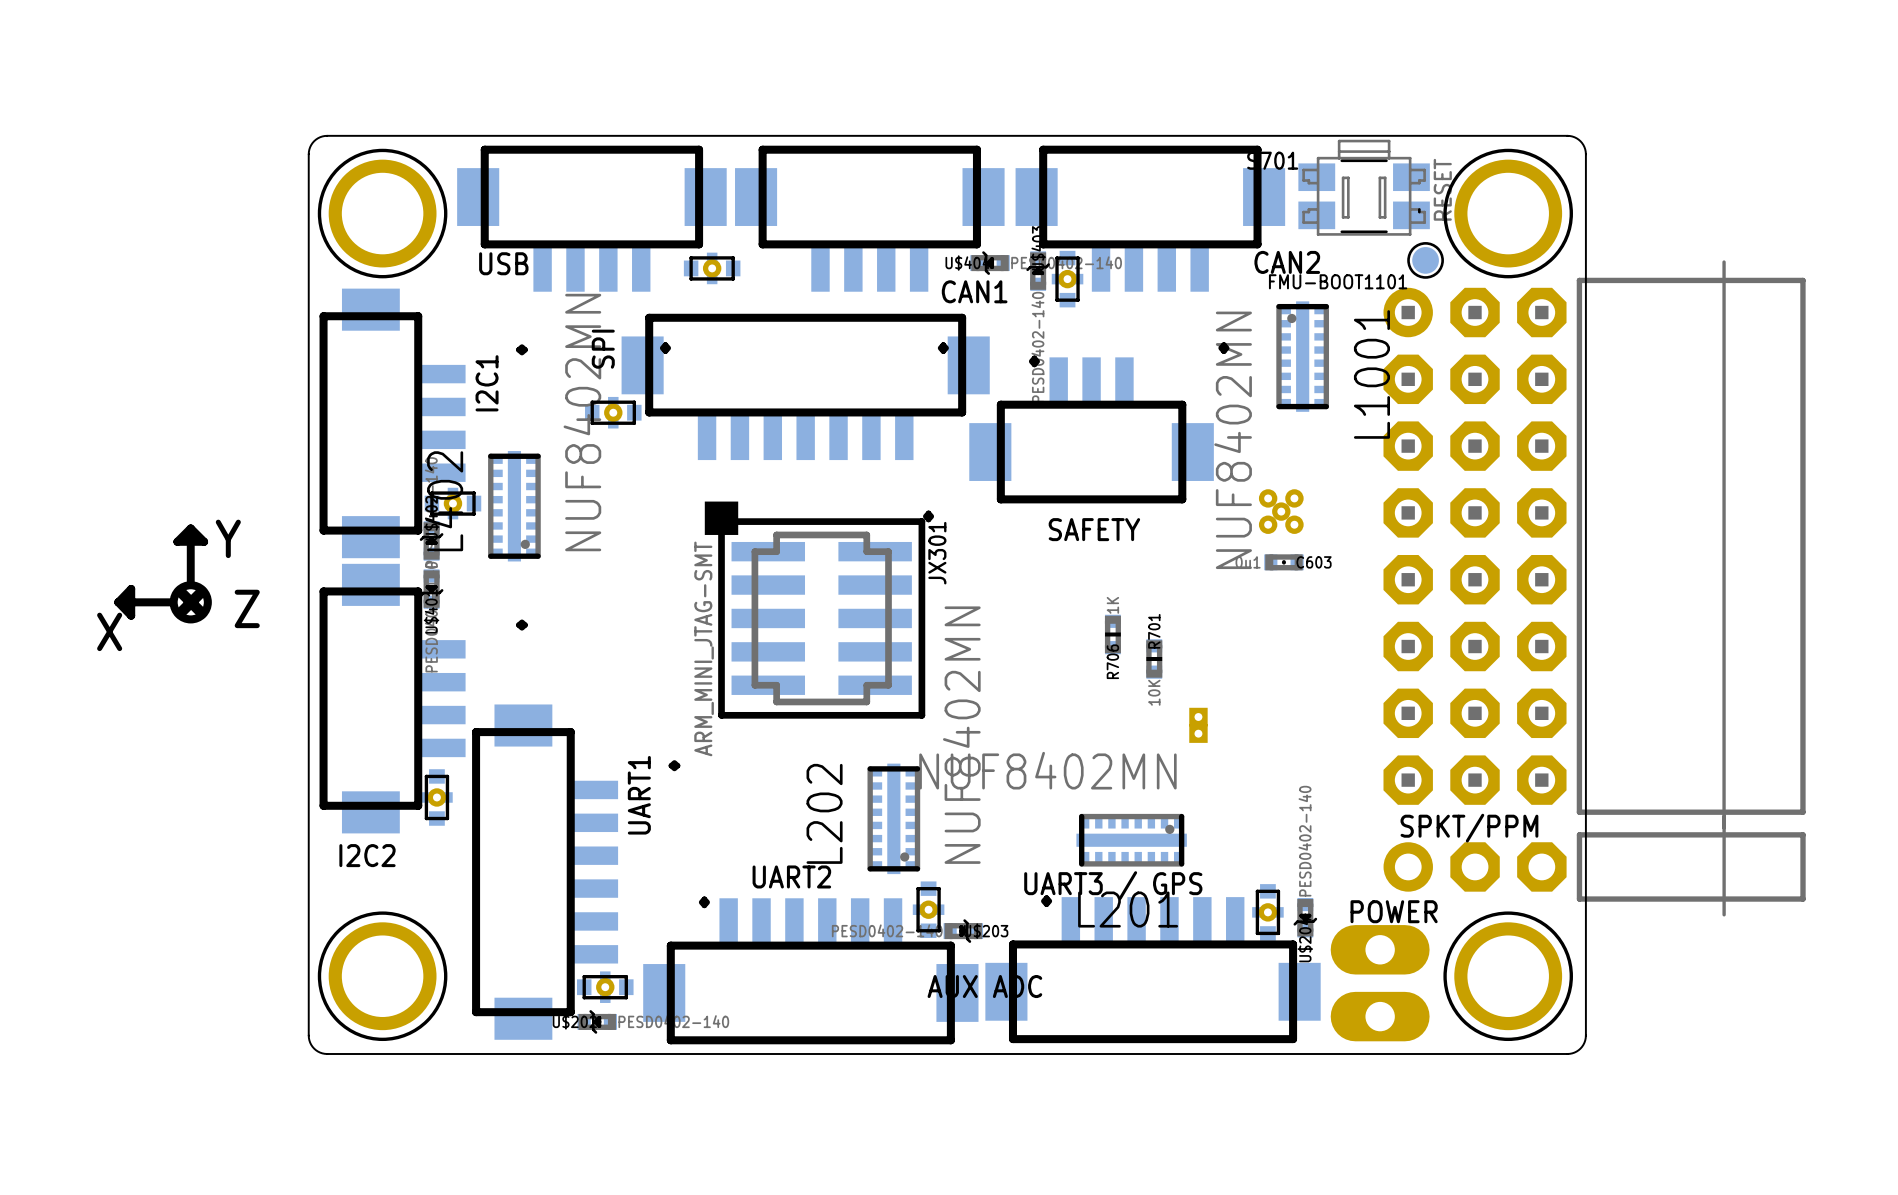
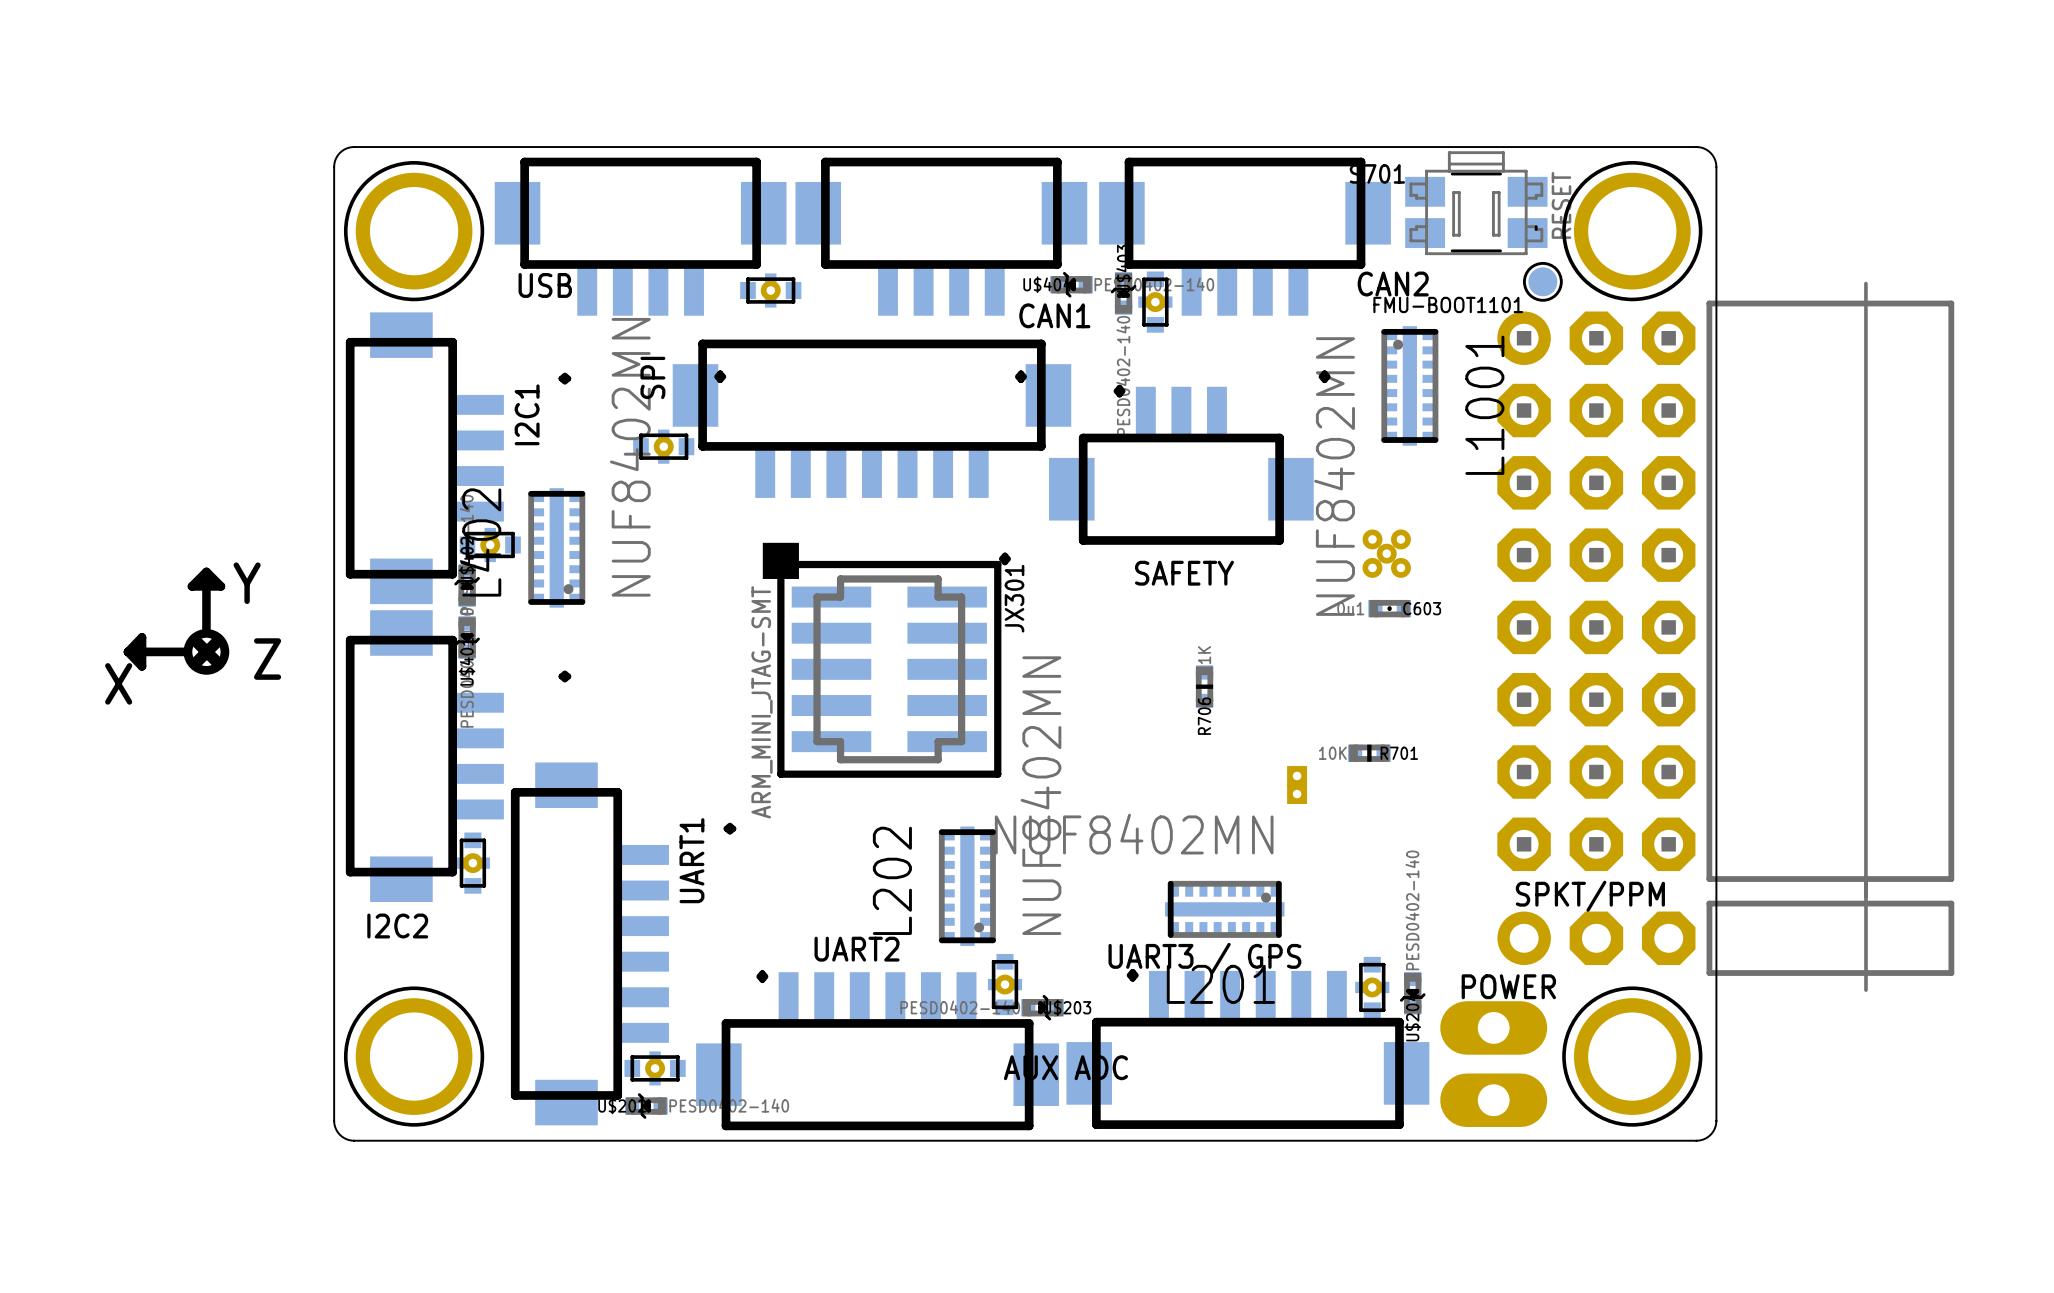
R701 rotation: 0° (1154, 659) -> 90° clockwise (1369, 753)
R701 position: (1154, 659) -> (1369, 753)

